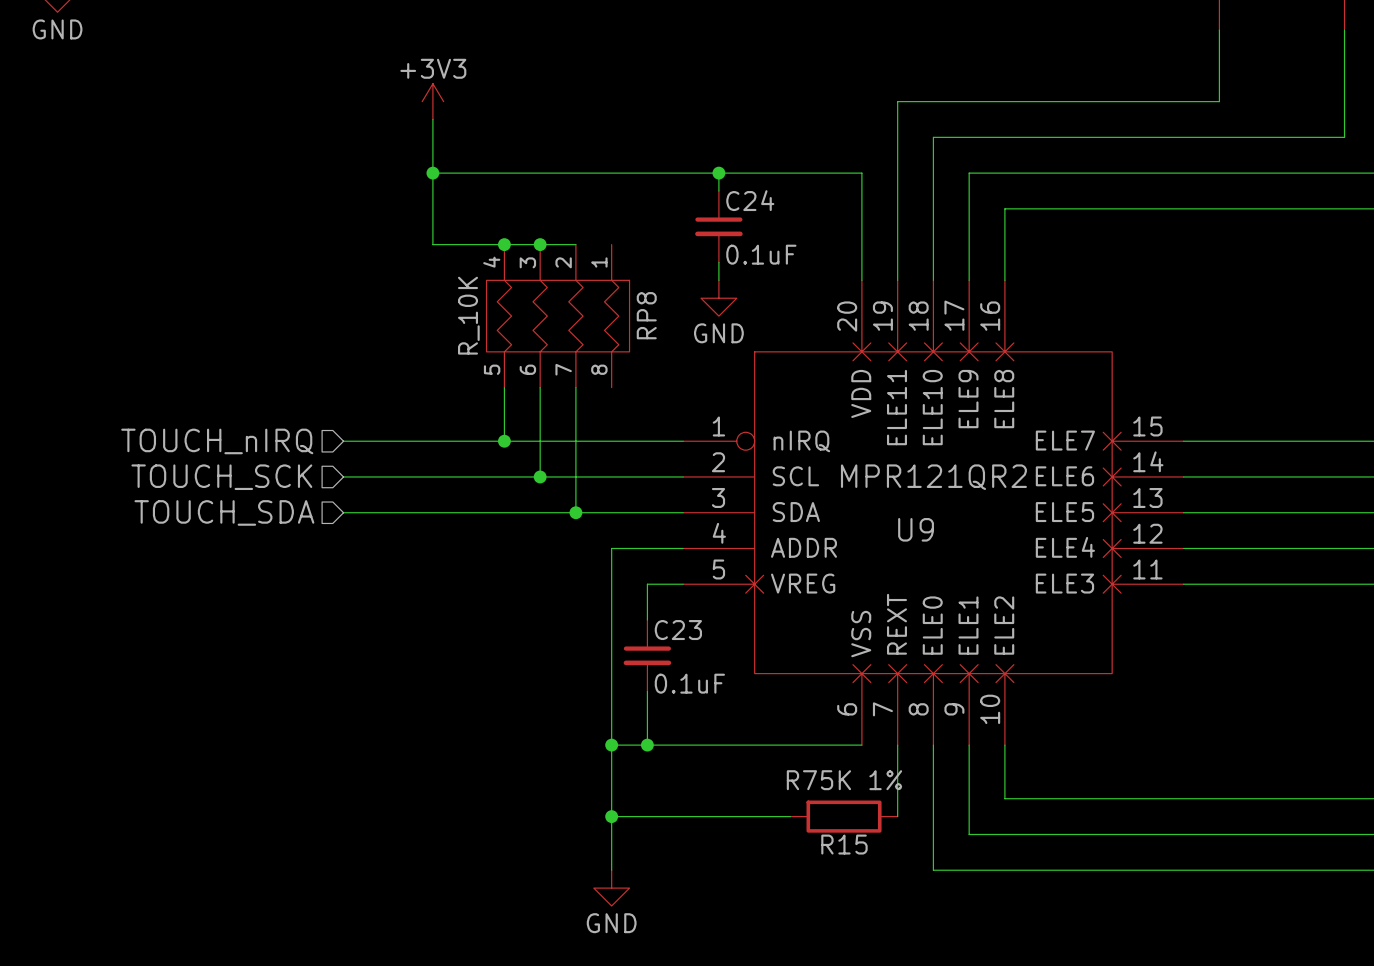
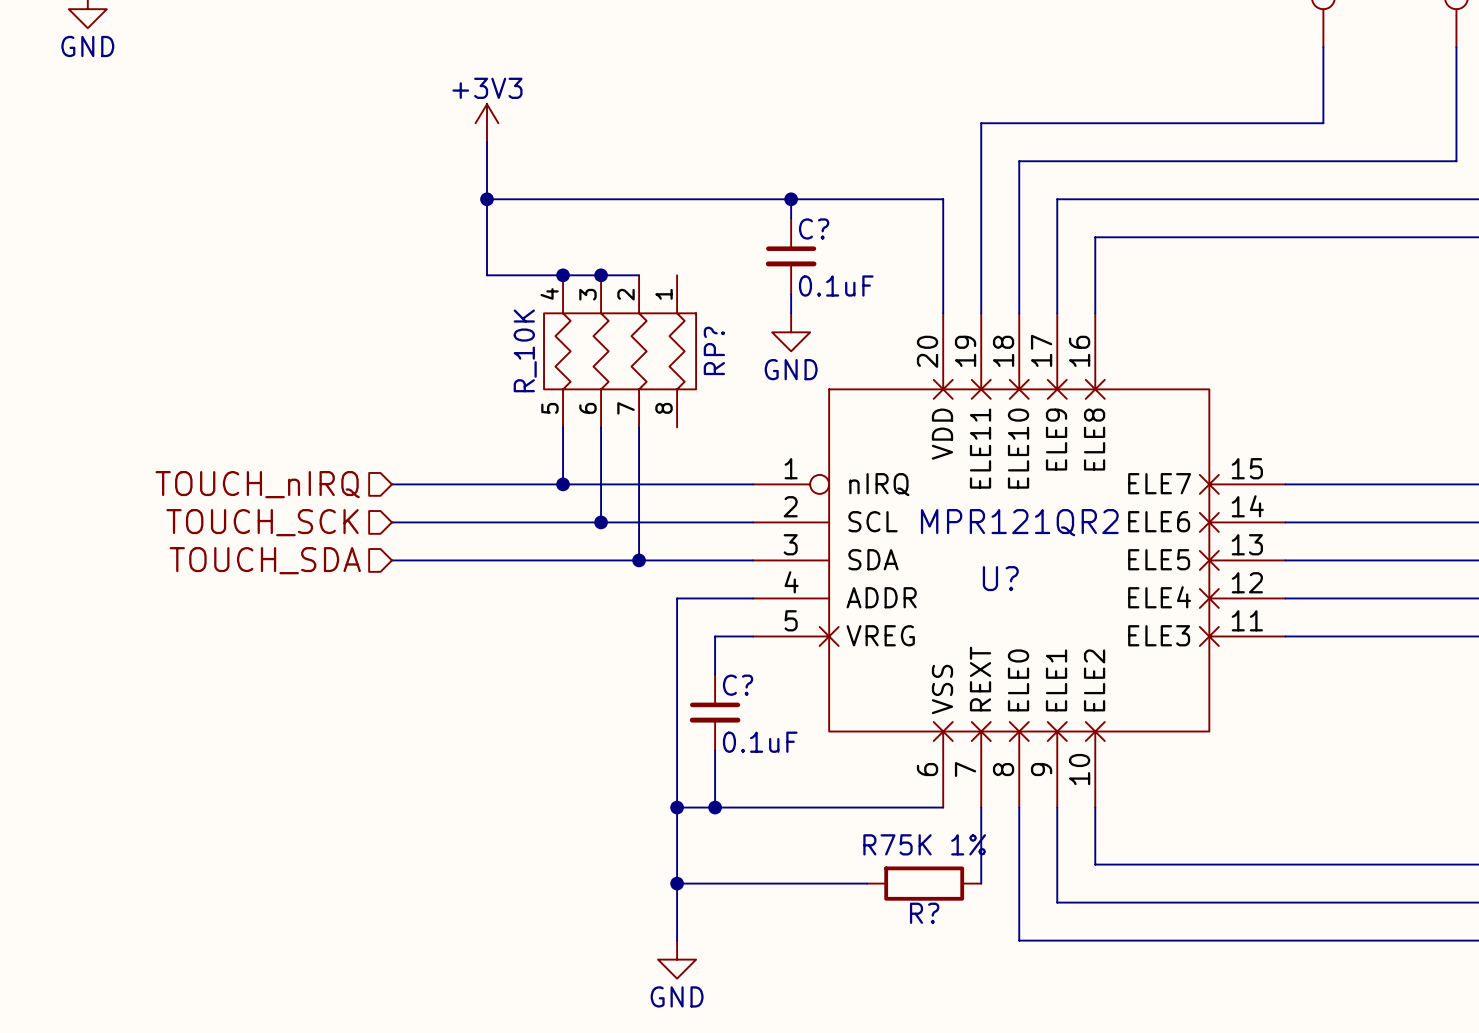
C24 name: C24 (750, 200) -> C? (814, 228)
RP8 name: RP8 (646, 315) -> RP? (714, 350)
U9 name: U9 (916, 529) -> U? (1000, 578)
C23 name: C23 (678, 630) -> C? (738, 685)
R15 name: R15 (844, 844) -> R? (924, 913)

